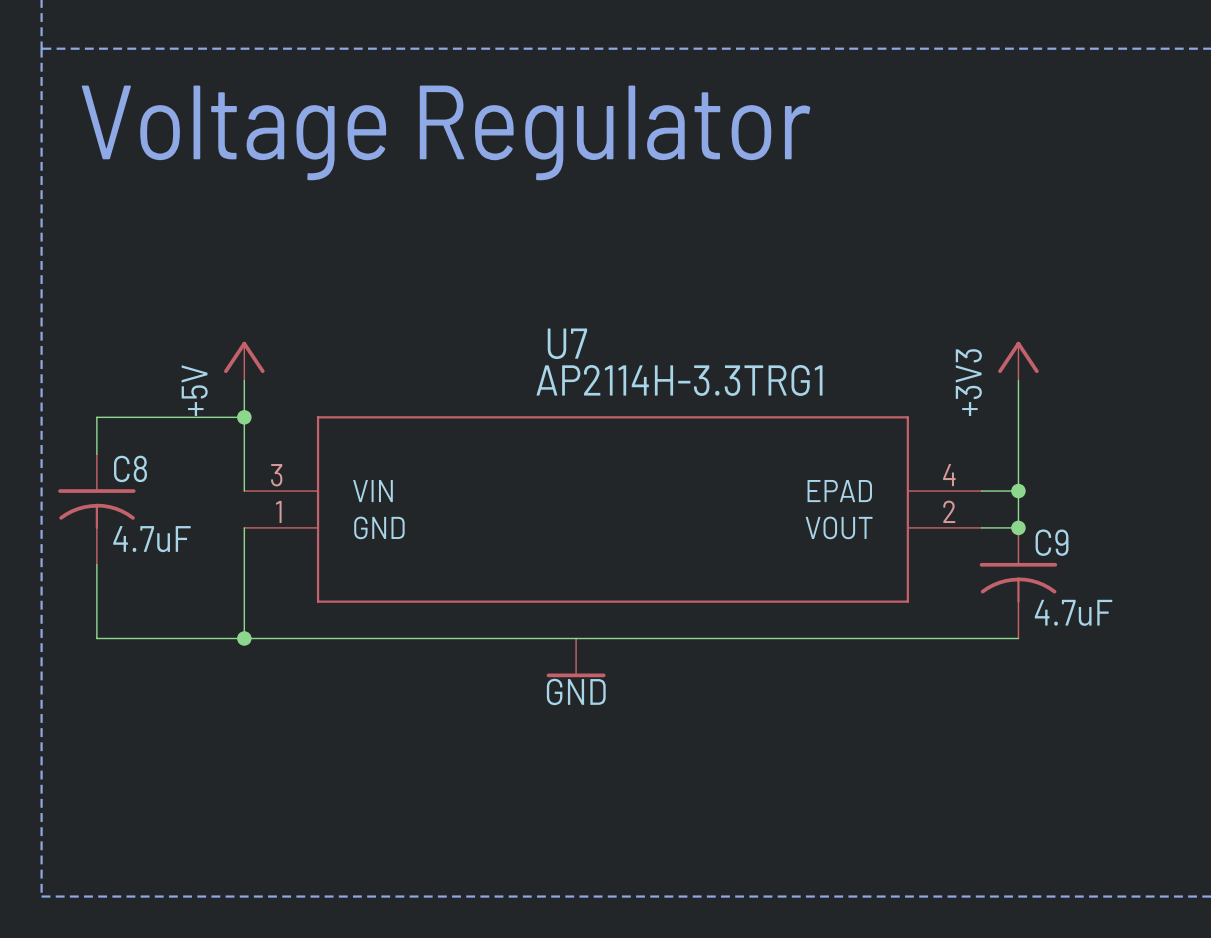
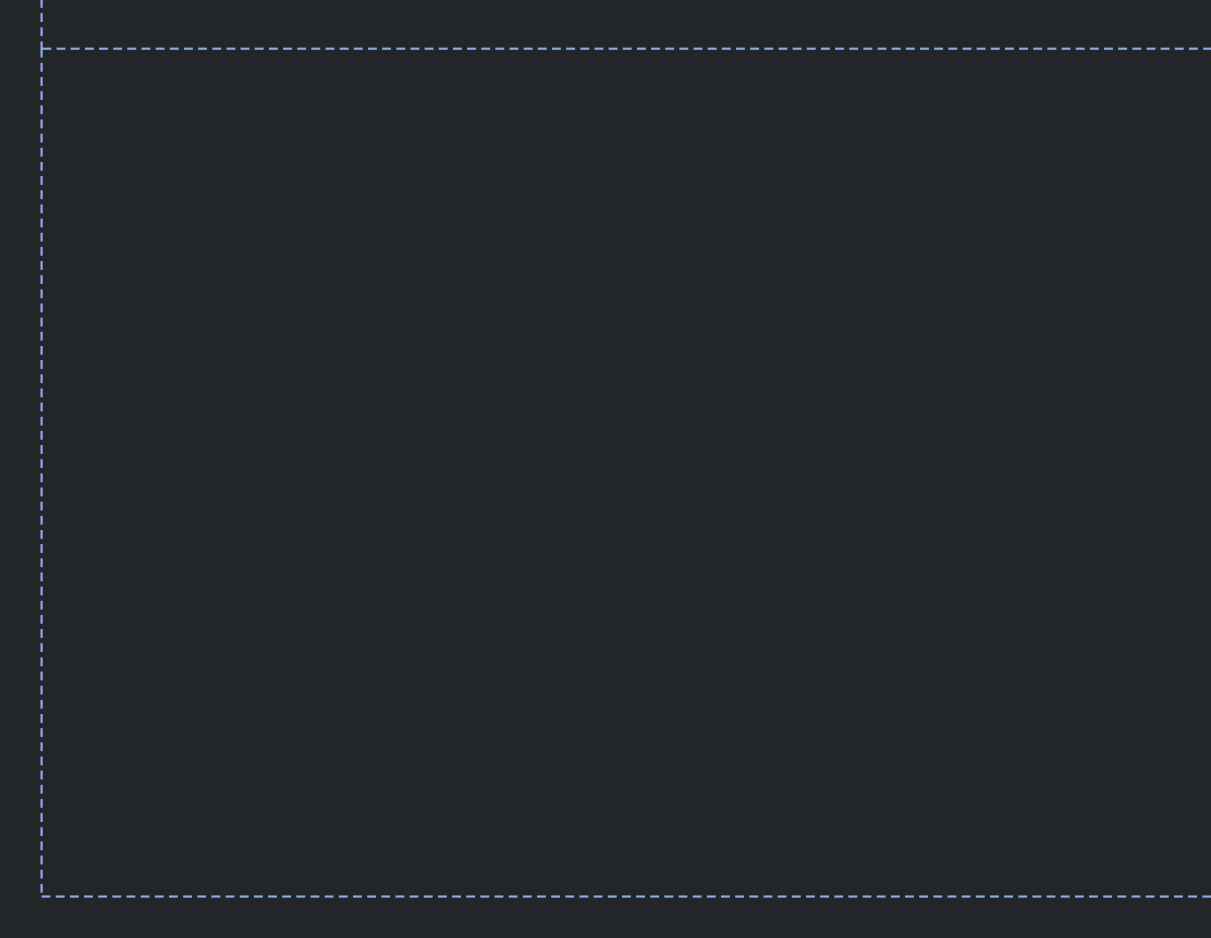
text: Voltage Regulator (446, 132) -> none
power symbol: +5V (244, 361) -> none
power symbol: +3V3 (1018, 361) -> none
wire: (244, 380) (244, 491) -> none
wire: (1018, 380) (1018, 527) (981, 527) -> none
wire: (244, 417) (96, 417) (96, 454) -> none
junction: (244, 417) -> none
wire: (981, 491) (1018, 491) -> none
junction: (1018, 491) -> none
C8: 4.7uF (96, 509) -> none
U7: AP2114H-3.3TRG1 (612, 509) -> none
wire: (244, 527) (244, 638) -> none
junction: (1018, 527) -> none
wire: (96, 564) (96, 638) (1018, 638) -> none
C9: 4.7uF (1018, 583) -> none
junction: (244, 638) -> none
power symbol: GND (576, 657) -> none

